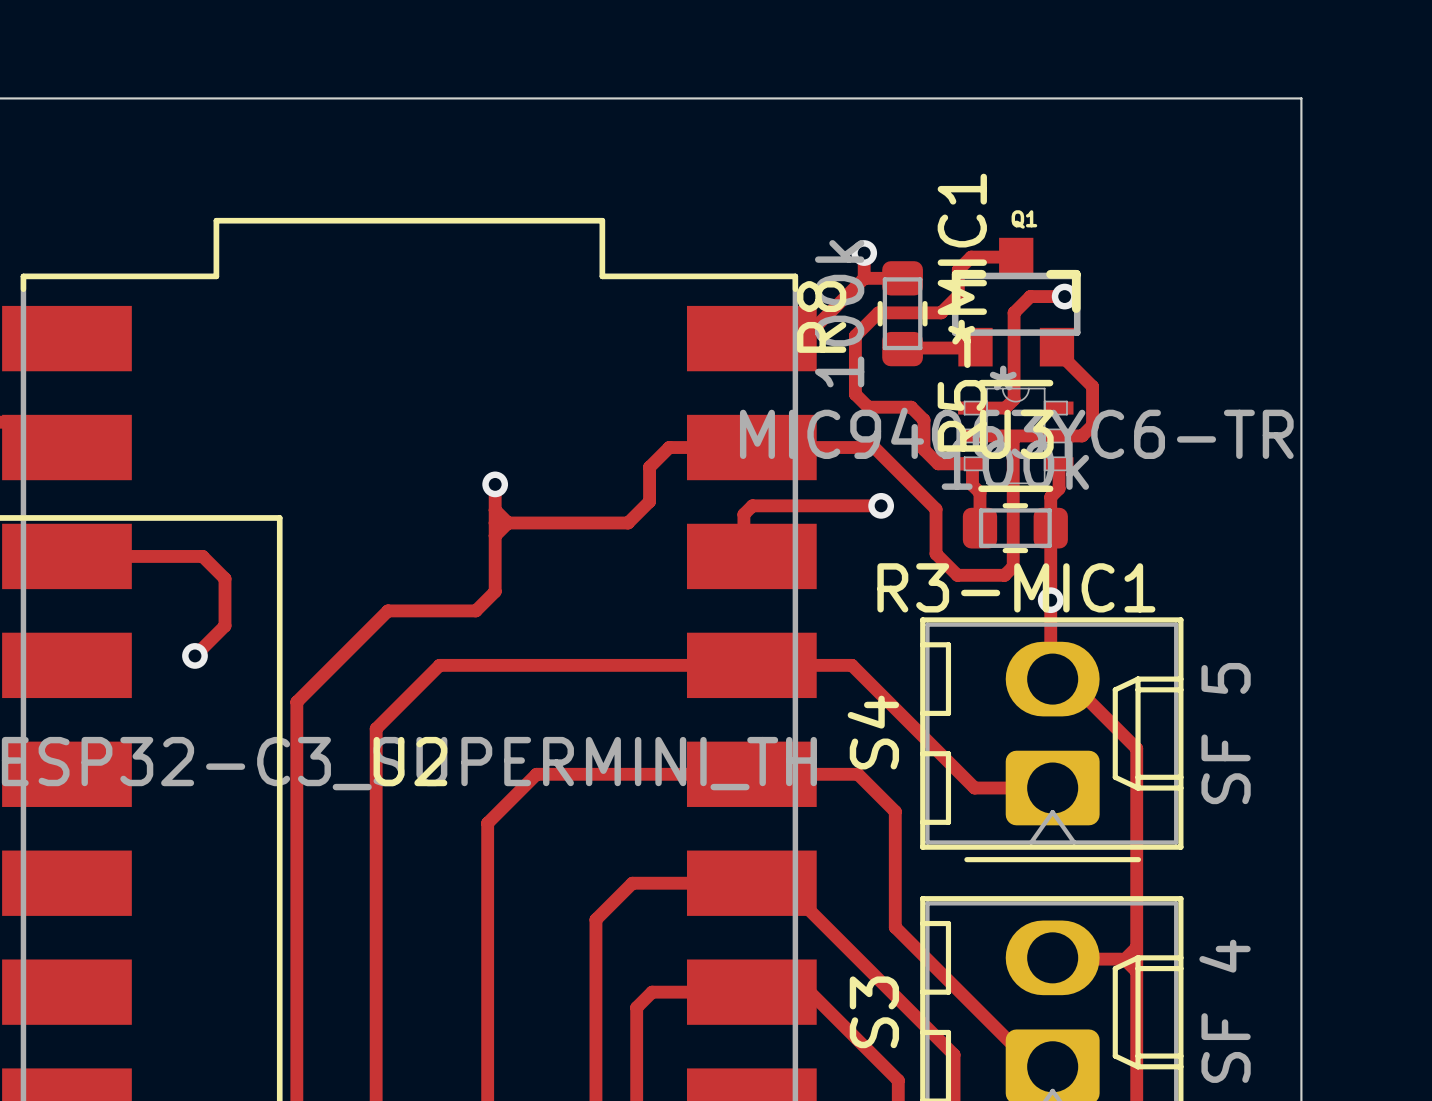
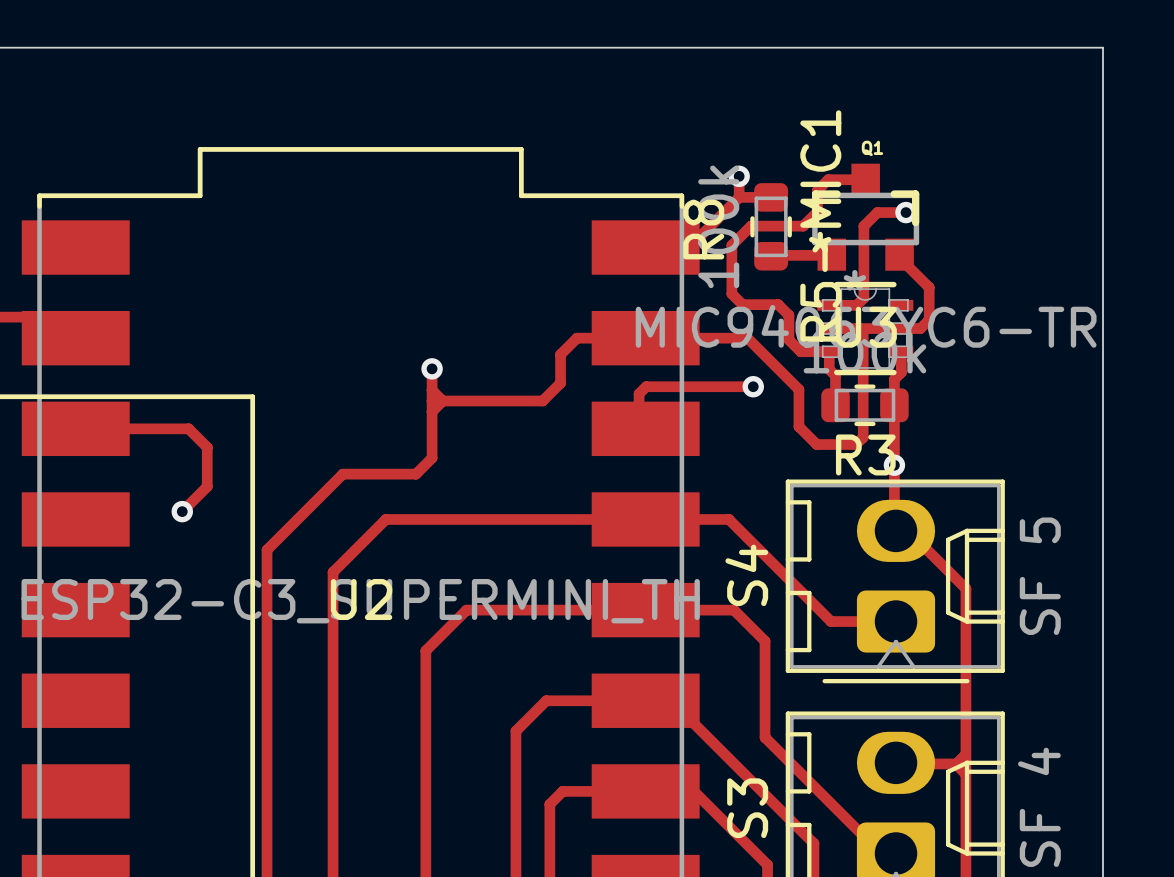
R3-MIC1 name: R3-MIC1 (1016, 587) -> R3 (865, 454)

